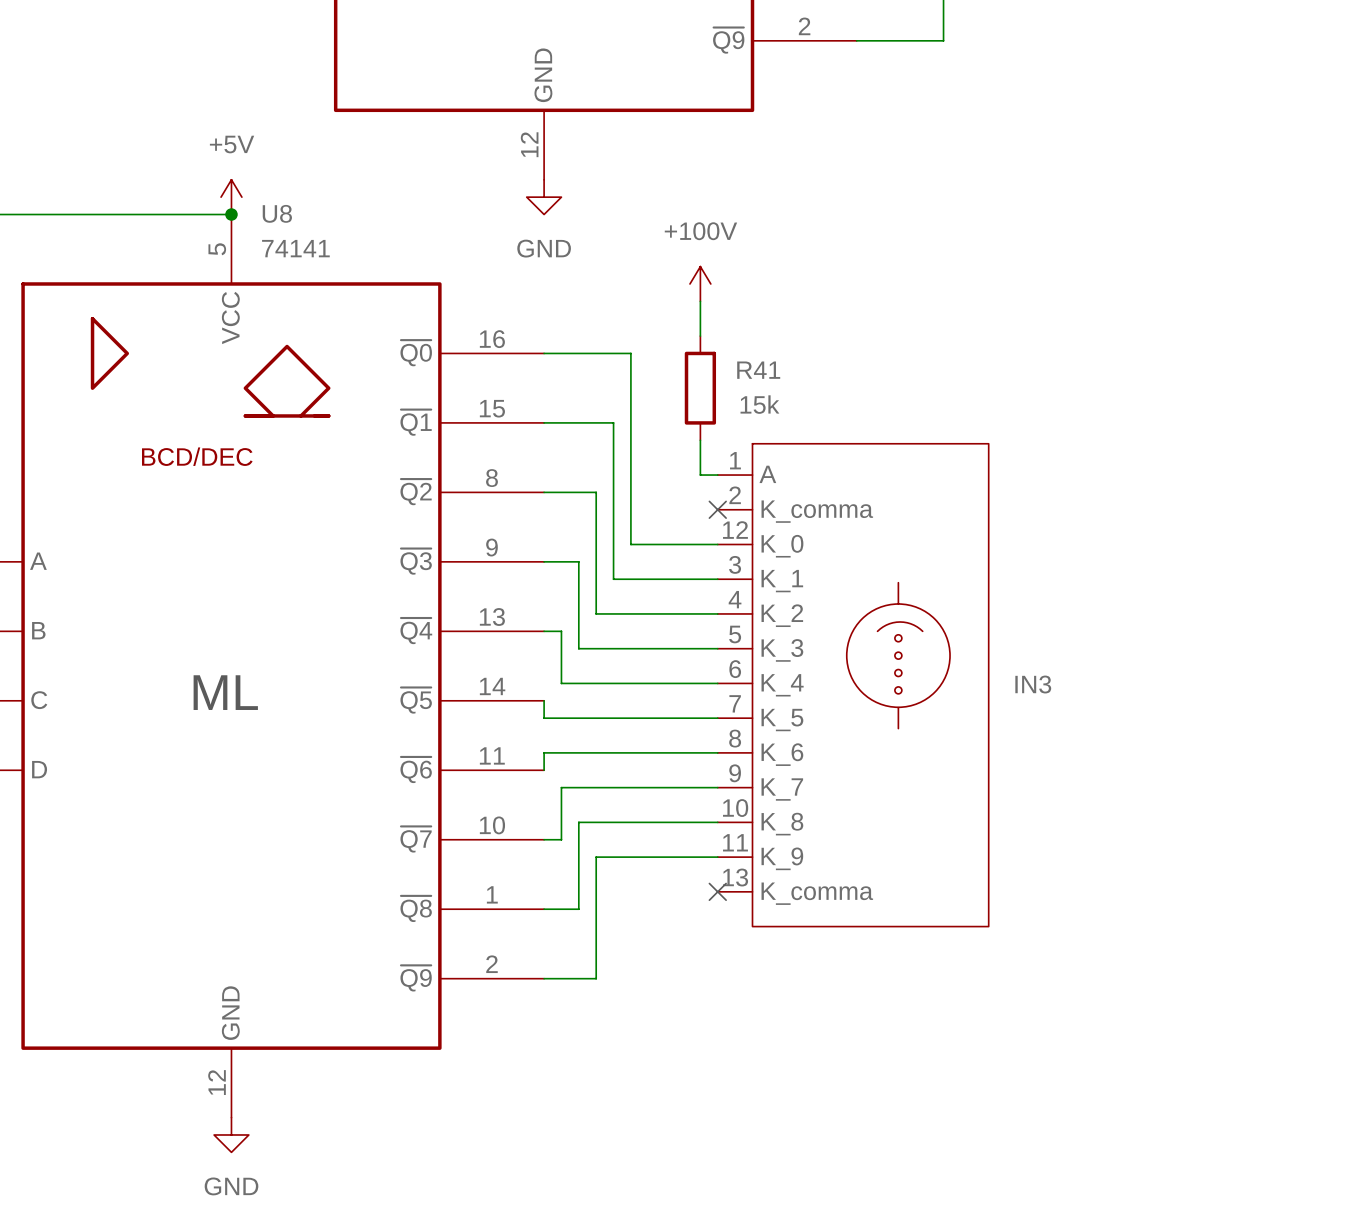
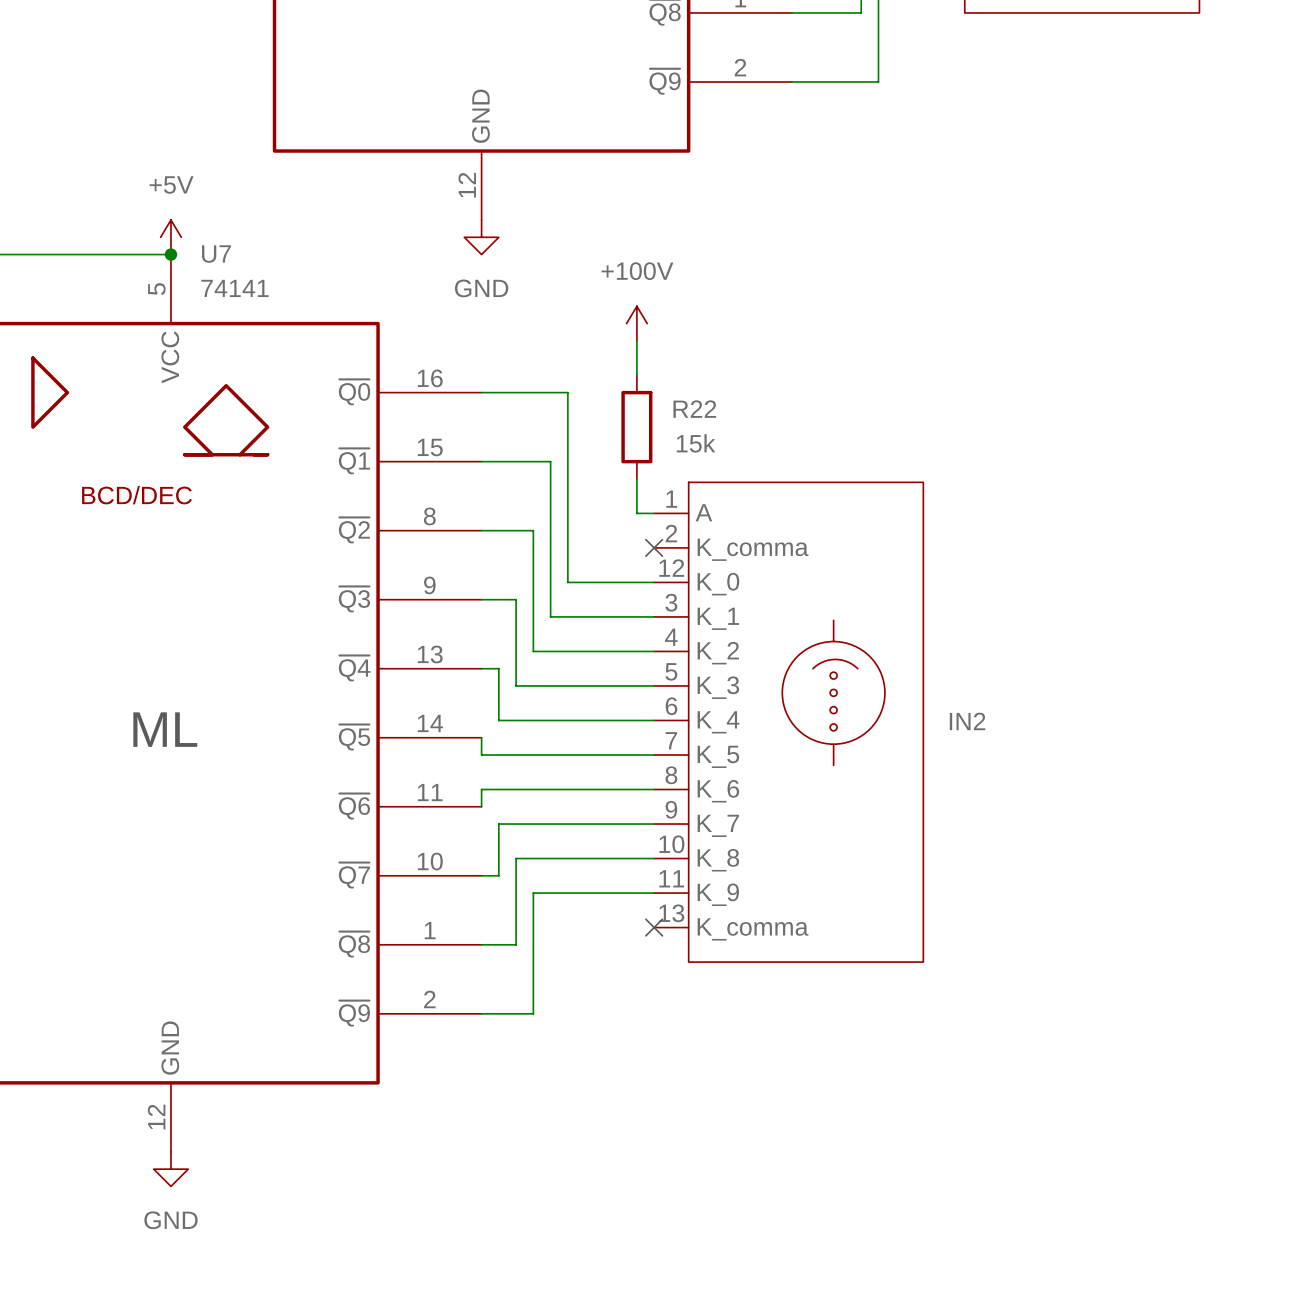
U8 name: U8 (277, 213) -> U7 (216, 254)
R41 name: R41 (758, 370) -> R22 (694, 409)
IN3 name: IN3 (1033, 684) -> IN2 (967, 721)

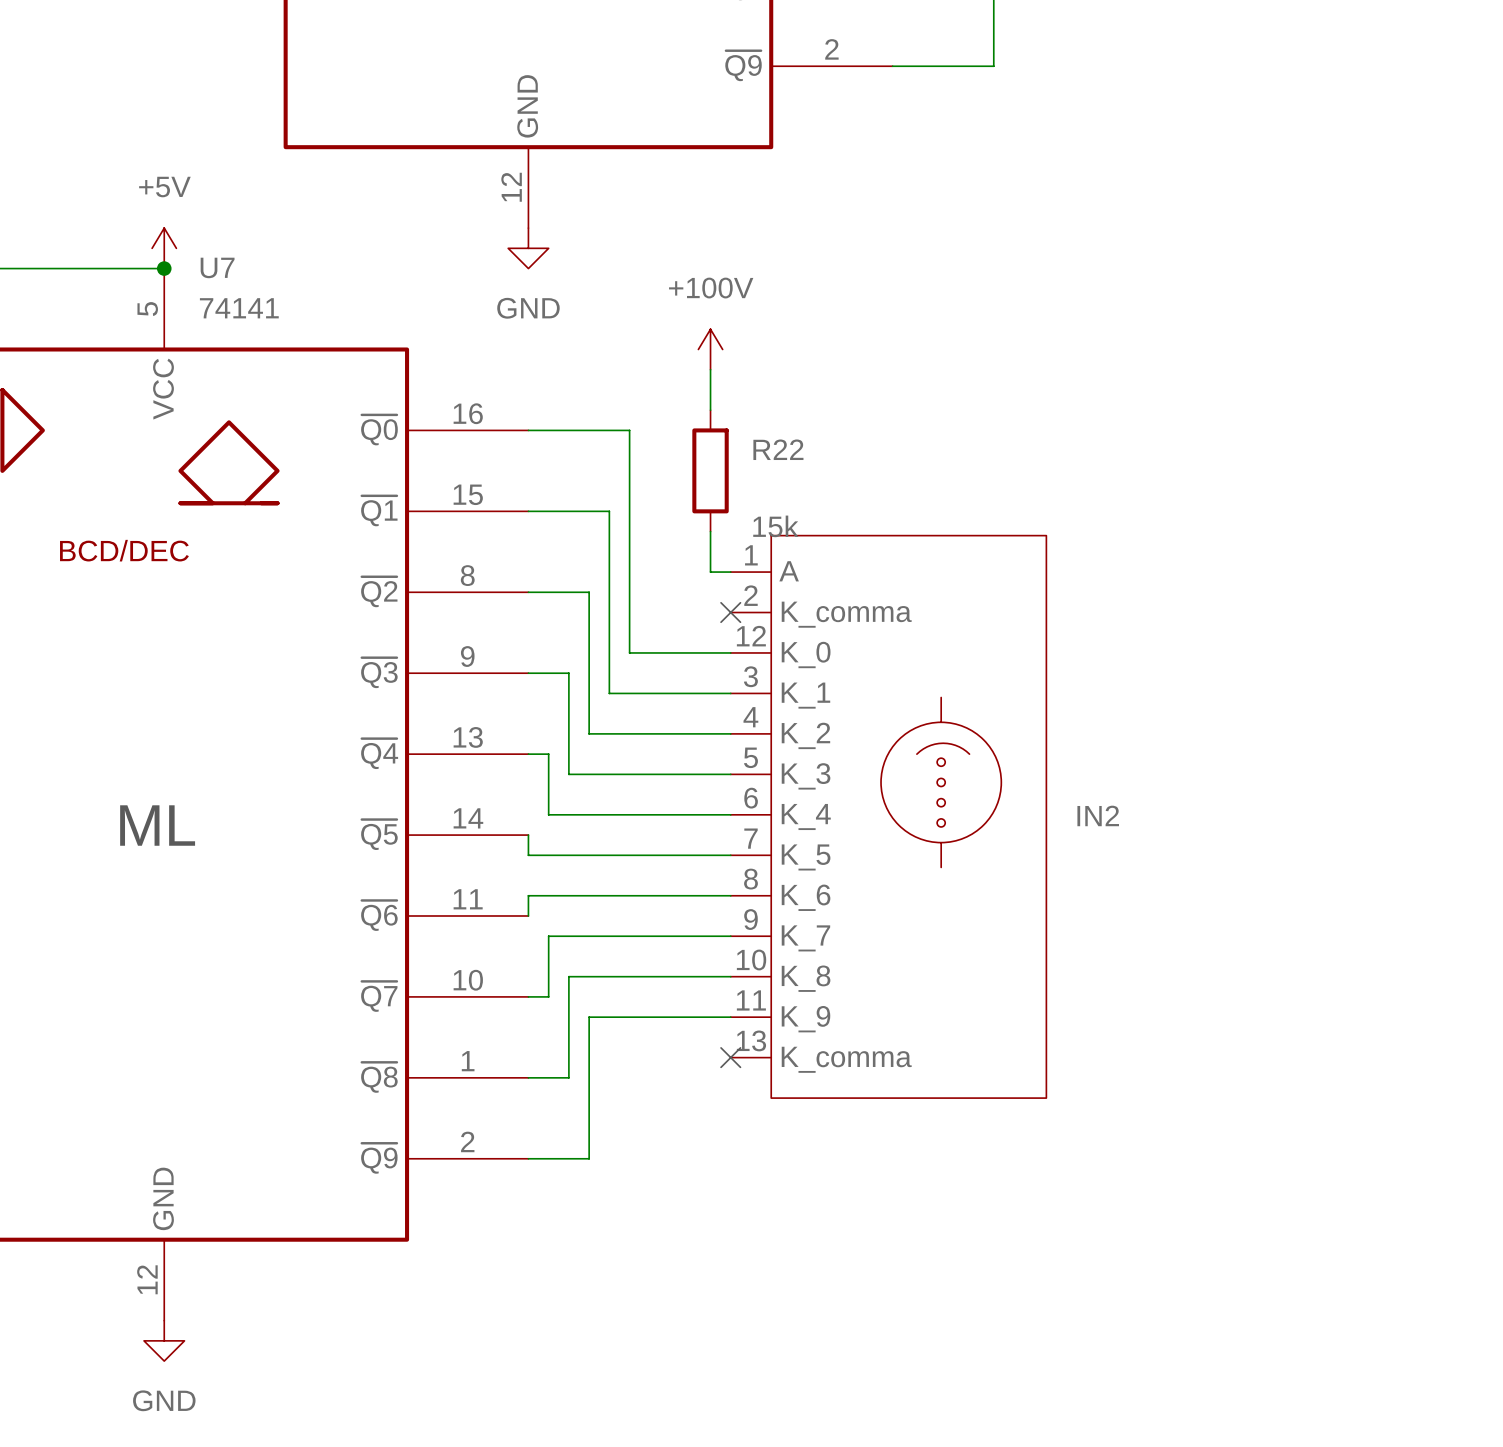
R22 value position: 15k (696, 443) -> 15k (775, 526)

